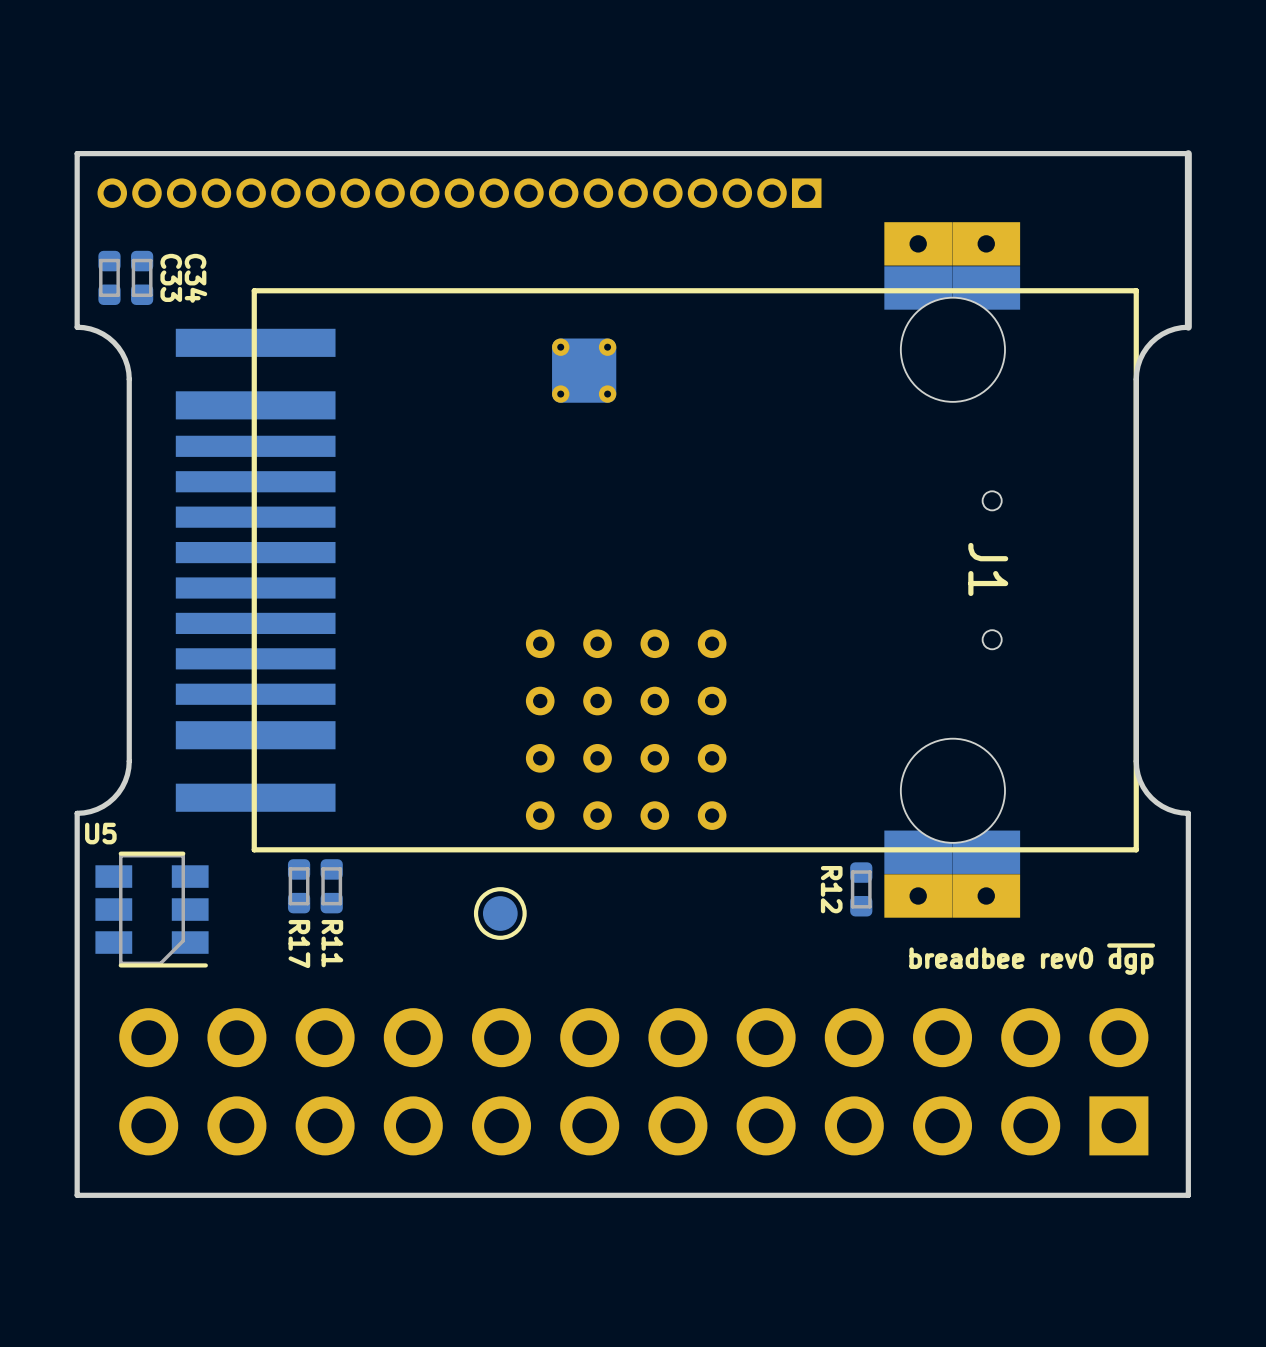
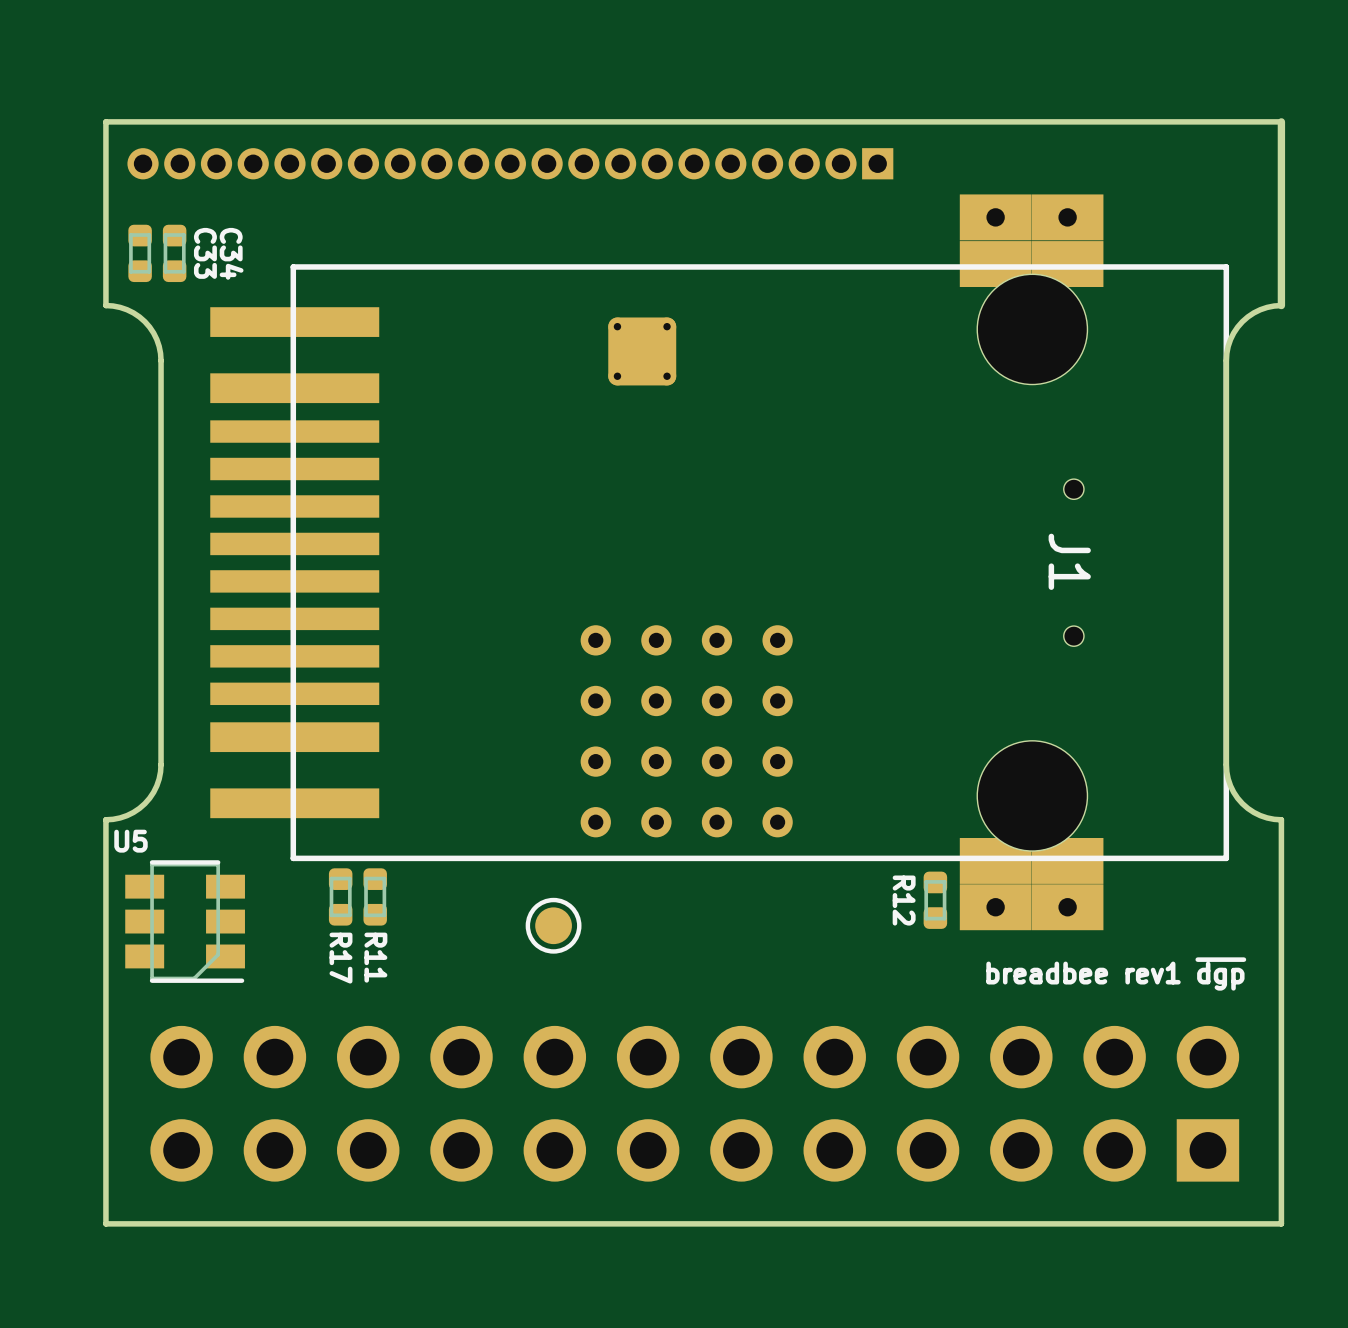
text: breadbee rev0 ~{dgp} (1032, 959) -> breadbee rev1 ~{dgp} (1116, 973)

